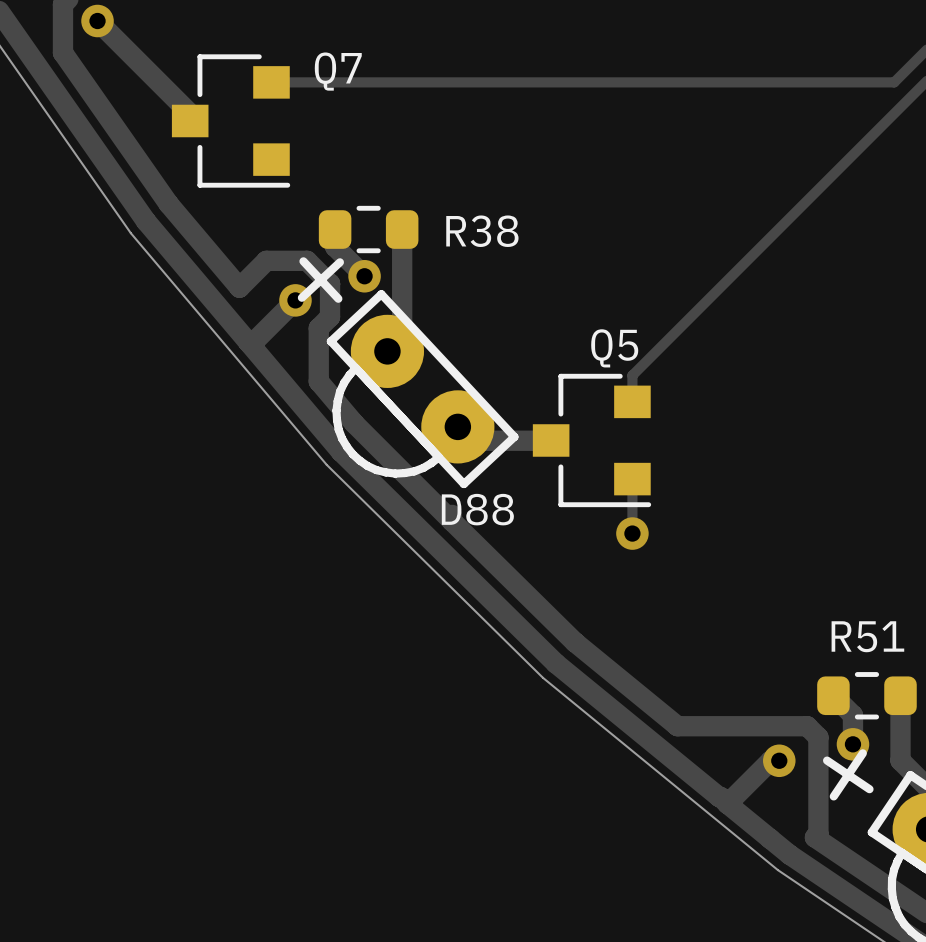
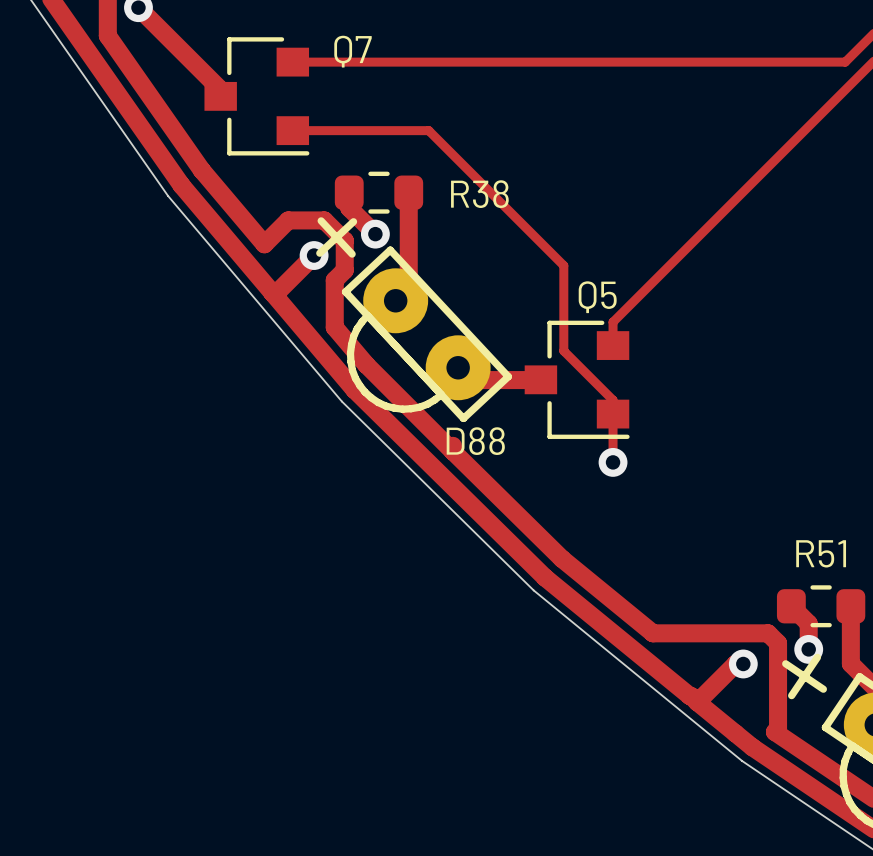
track: none -> (292, 130) (428, 130) (563, 265) (563, 350) (613, 400) (613, 414)

